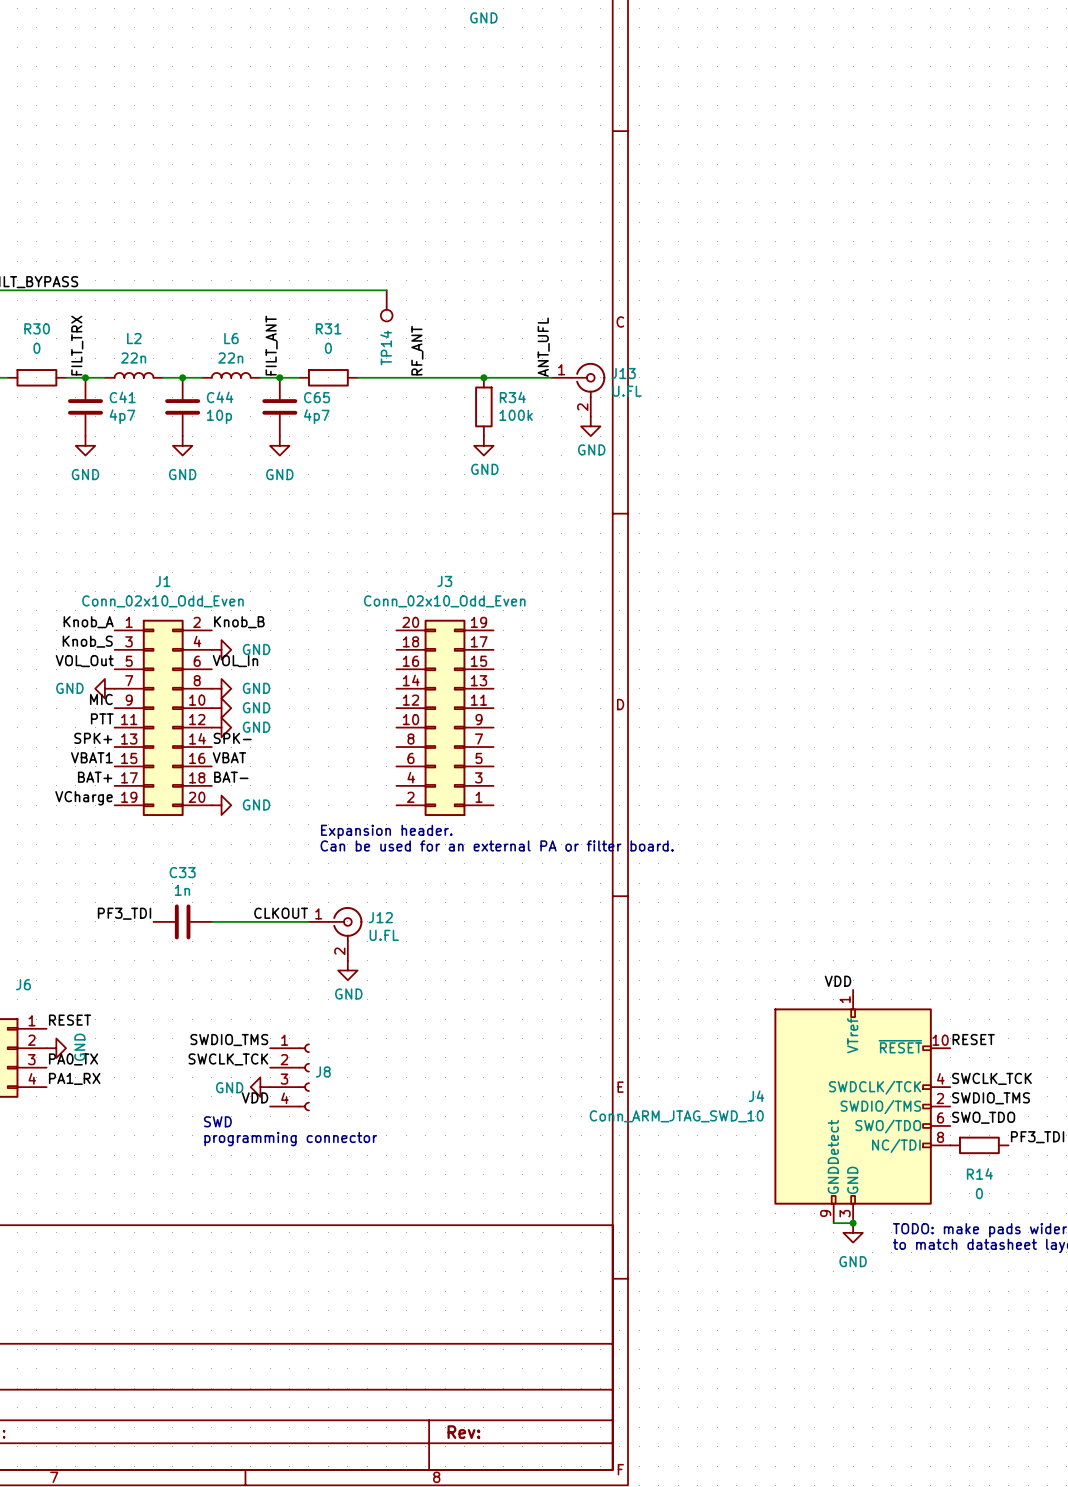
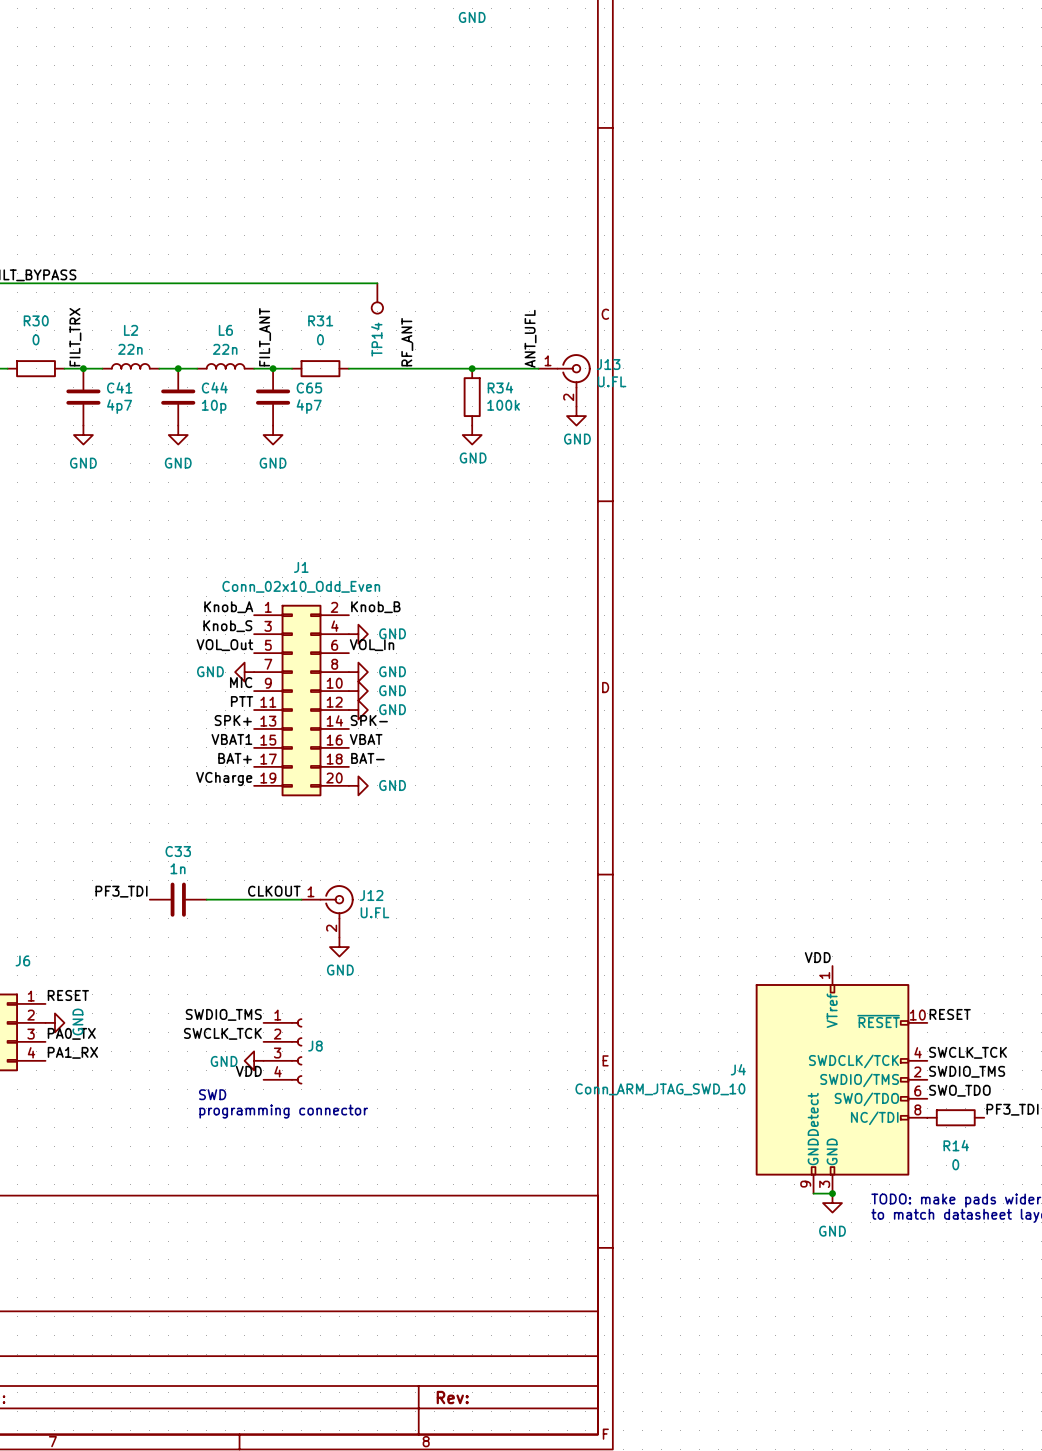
label position: Knob_A (88, 622) -> Knob_A (228, 607)
label position: Knob_B (239, 622) -> Knob_B (375, 607)
label position: Knob_S (87, 641) -> Knob_S (227, 626)
power symbol: GND (221, 649) -> none
power symbol: none -> GND (358, 634)
label position: VOL_Out (84, 661) -> VOL_Out (224, 645)
label position: VOL_In (235, 661) -> VOL_In (372, 645)
power symbol: GND (104, 688) -> none
power symbol: GND (221, 688) -> none
power symbol: none -> GND (244, 672)
power symbol: none -> GND (358, 672)
label position: MIC (101, 699) -> MIC (241, 682)
power symbol: GND (221, 708) -> none
power symbol: none -> GND (358, 691)
J1 position: (163, 717) -> (301, 700)
J3: Conn_02x10_Odd_Even (445, 717) -> none
label position: PTT (102, 718) -> PTT (242, 701)
power symbol: GND (221, 727) -> none
power symbol: none -> GND (358, 710)
label position: SPK+ (93, 738) -> SPK+ (233, 720)
label position: SPK- (232, 738) -> SPK- (369, 720)
label position: VBAT1 (91, 757) -> VBAT1 (231, 739)
label position: VBAT (229, 757) -> VBAT (366, 739)
label position: BAT+ (95, 777) -> BAT+ (235, 758)
label position: BAT- (231, 777) -> BAT- (367, 758)
label position: VCharge (84, 798) -> VCharge (224, 778)
power symbol: GND (221, 805) -> none
power symbol: none -> GND (358, 785)
text: Expansion header. (386, 831) -> none
text: Can be used for an external PA or filter board. (497, 845) -> none

